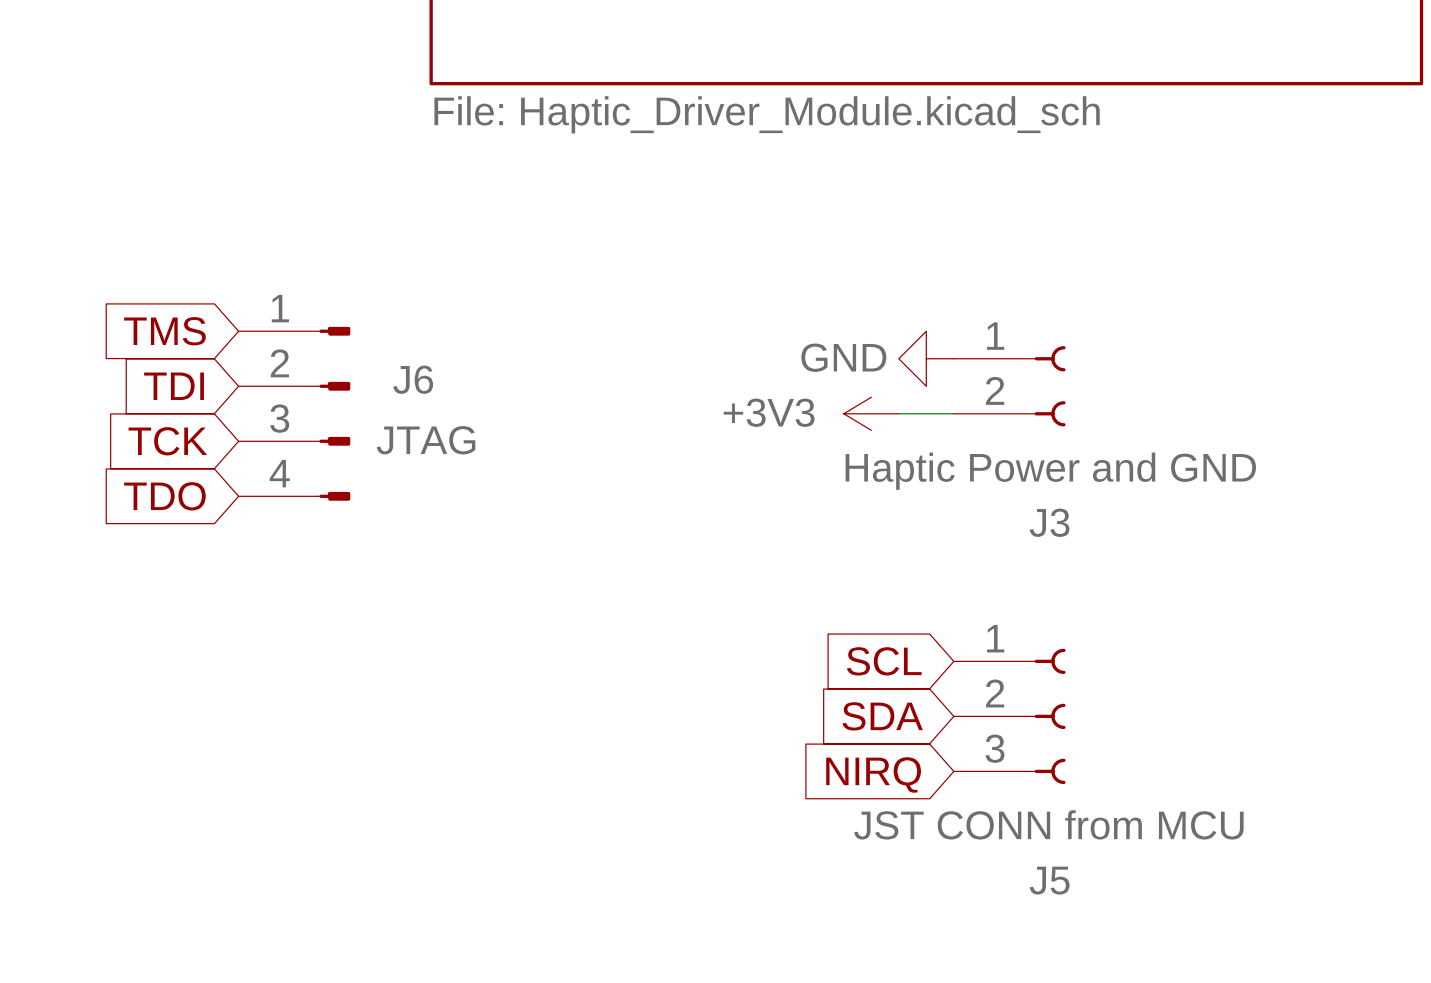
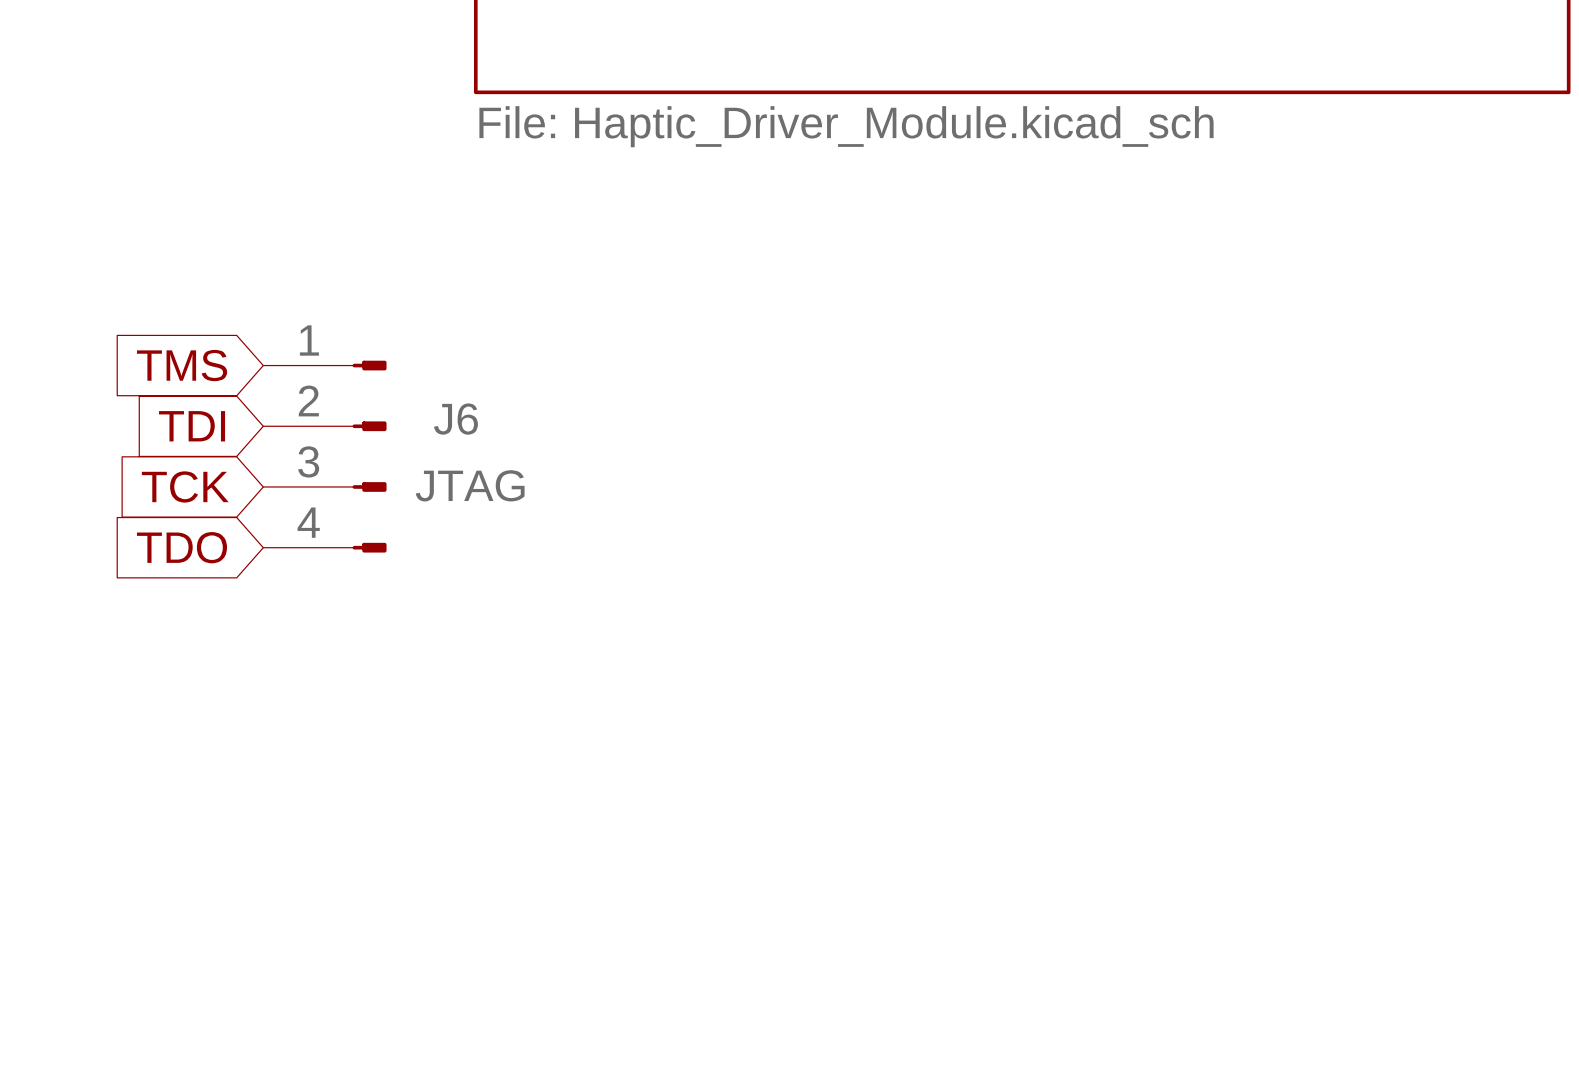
power symbol: GND (926, 358) -> none
J3: Haptic Power and GND (1009, 386) -> none
power symbol: +3V3 (871, 413) -> none
wire: (898, 413) (953, 413) -> none
global label: SCL (884, 661) -> none
global label: SDA (882, 716) -> none
J5: JST CONN from MCU (1009, 716) -> none
global label: NIRQ (873, 774) -> none

